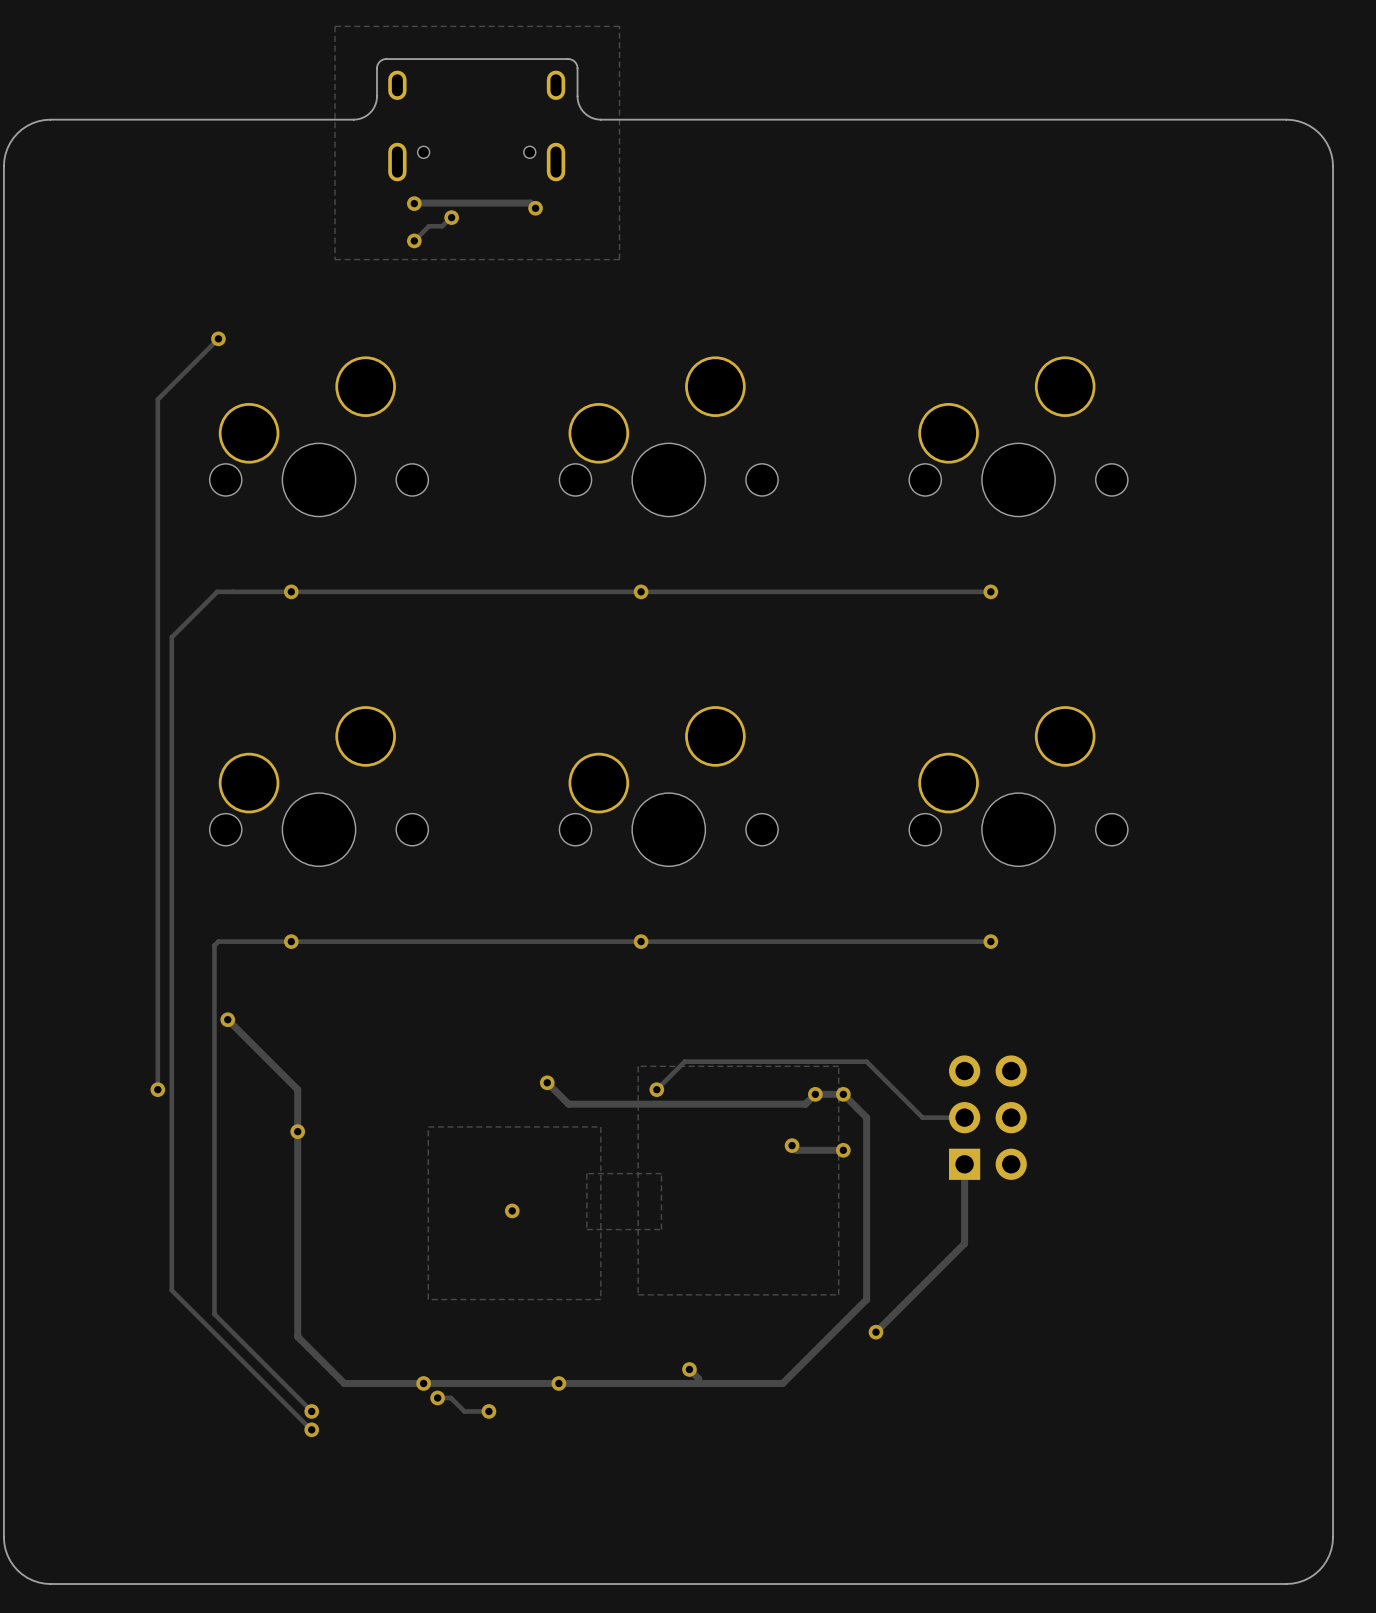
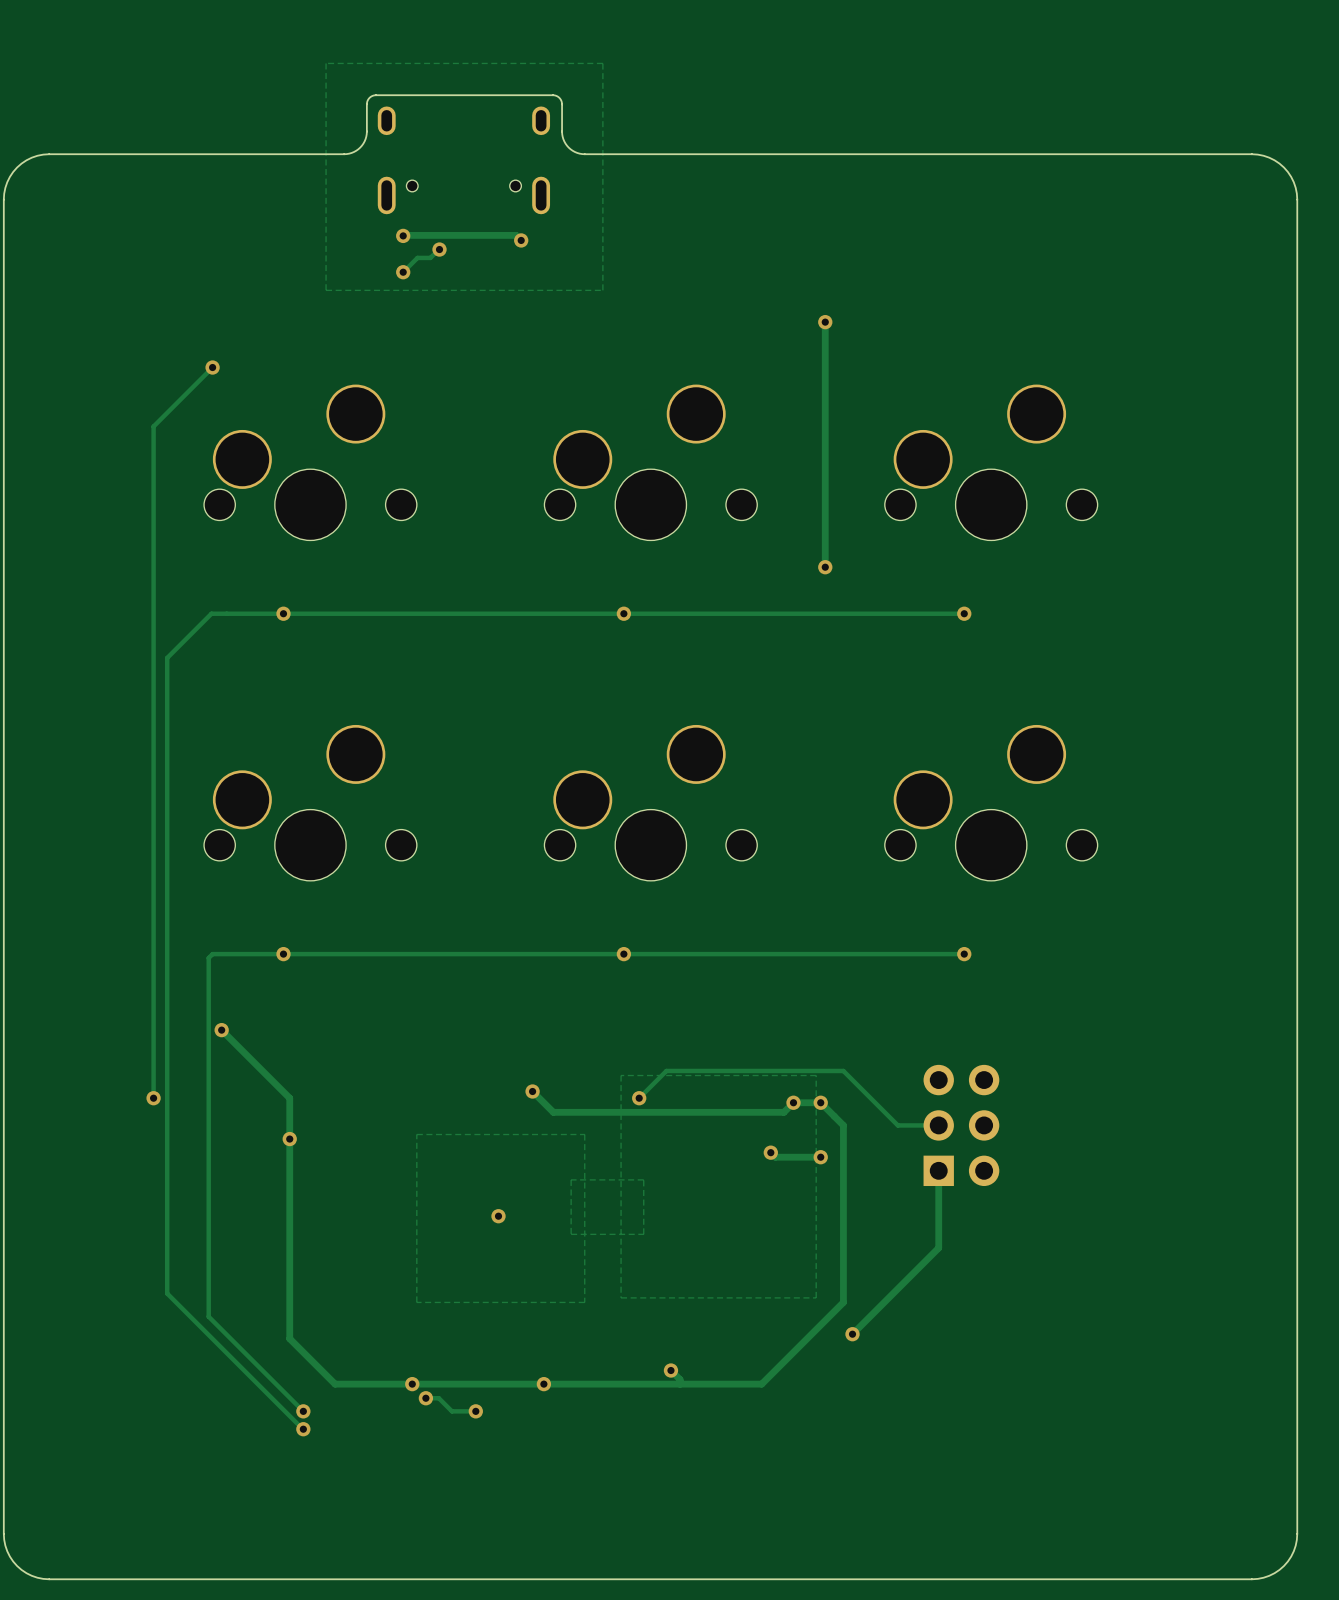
track: none -> (825, 322) (825, 567)
via: none -> (825, 322)
via: none -> (825, 567)

